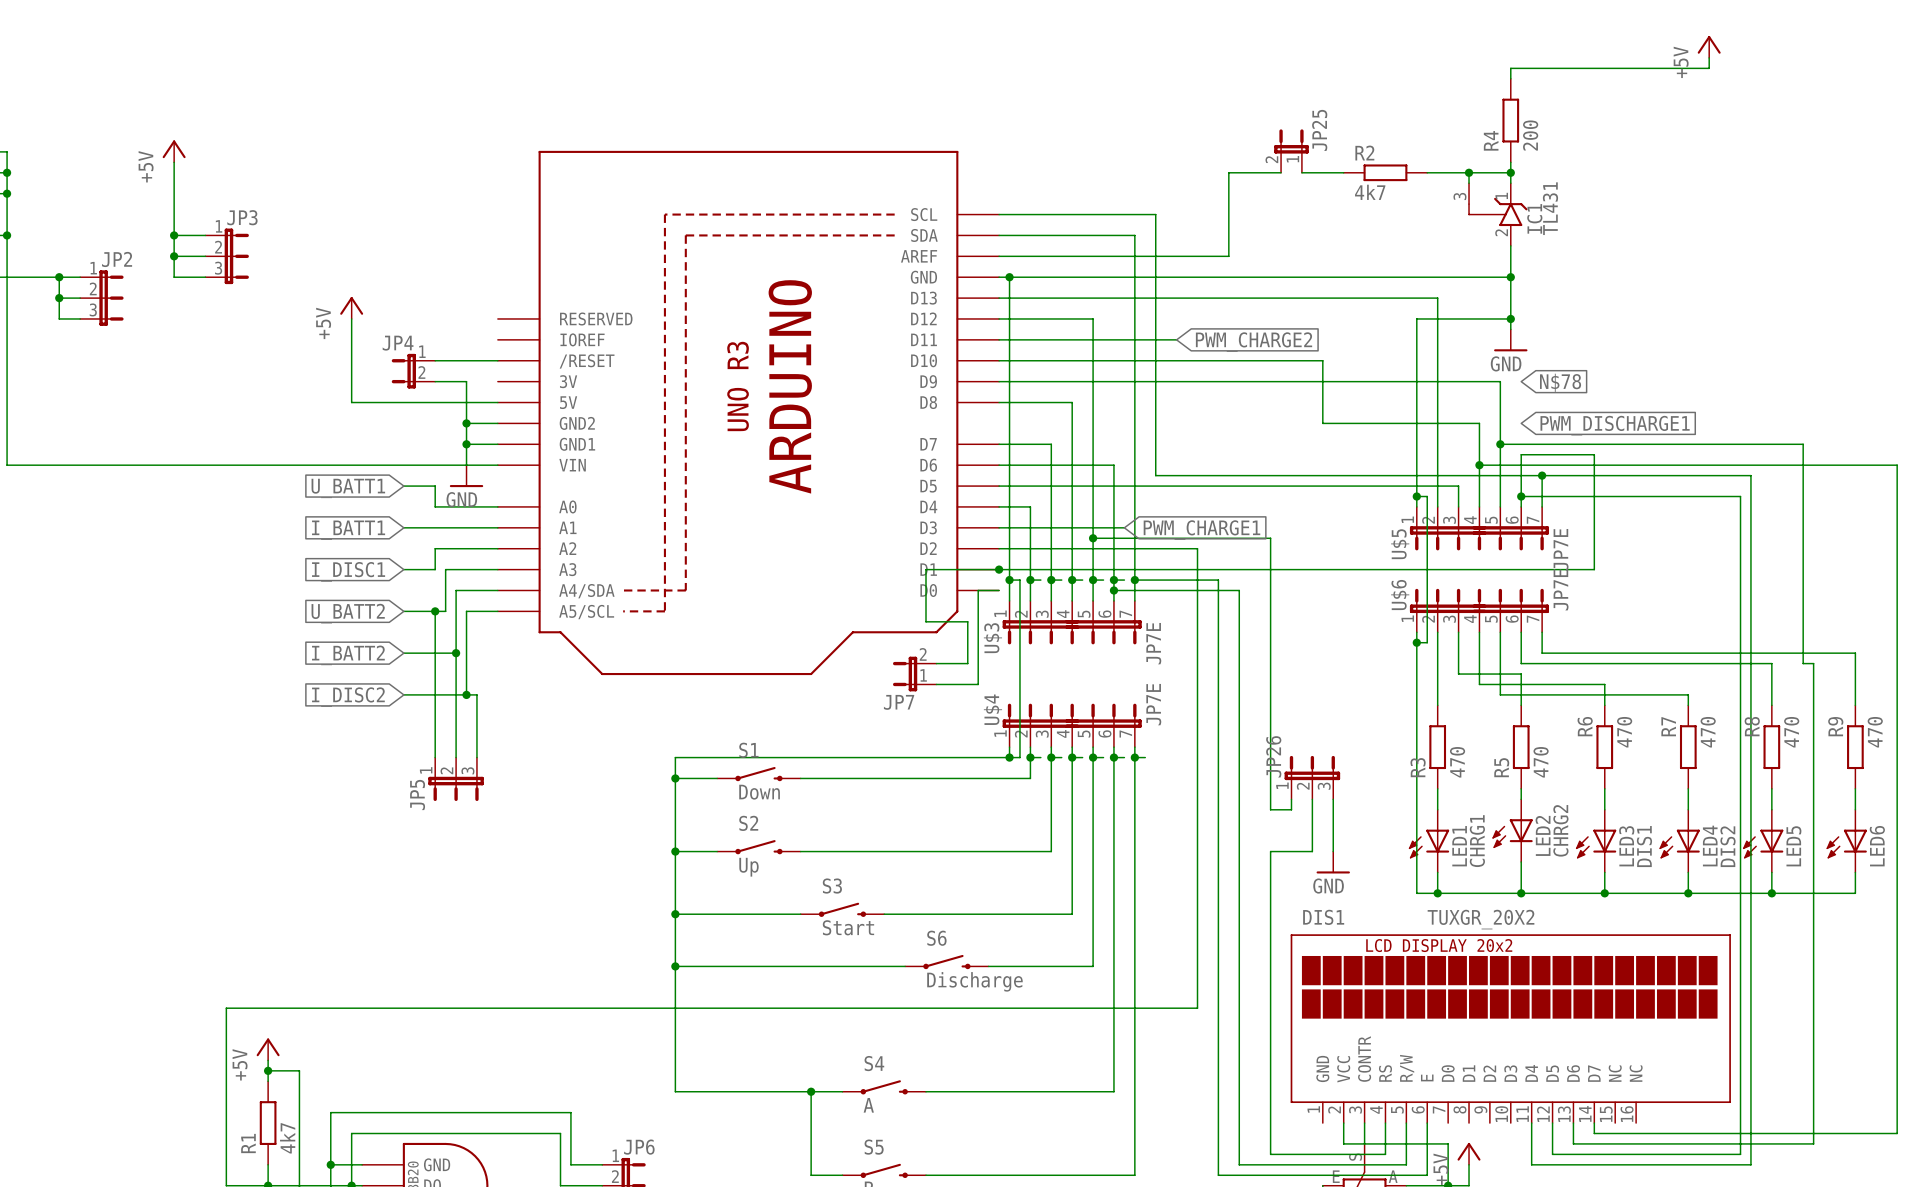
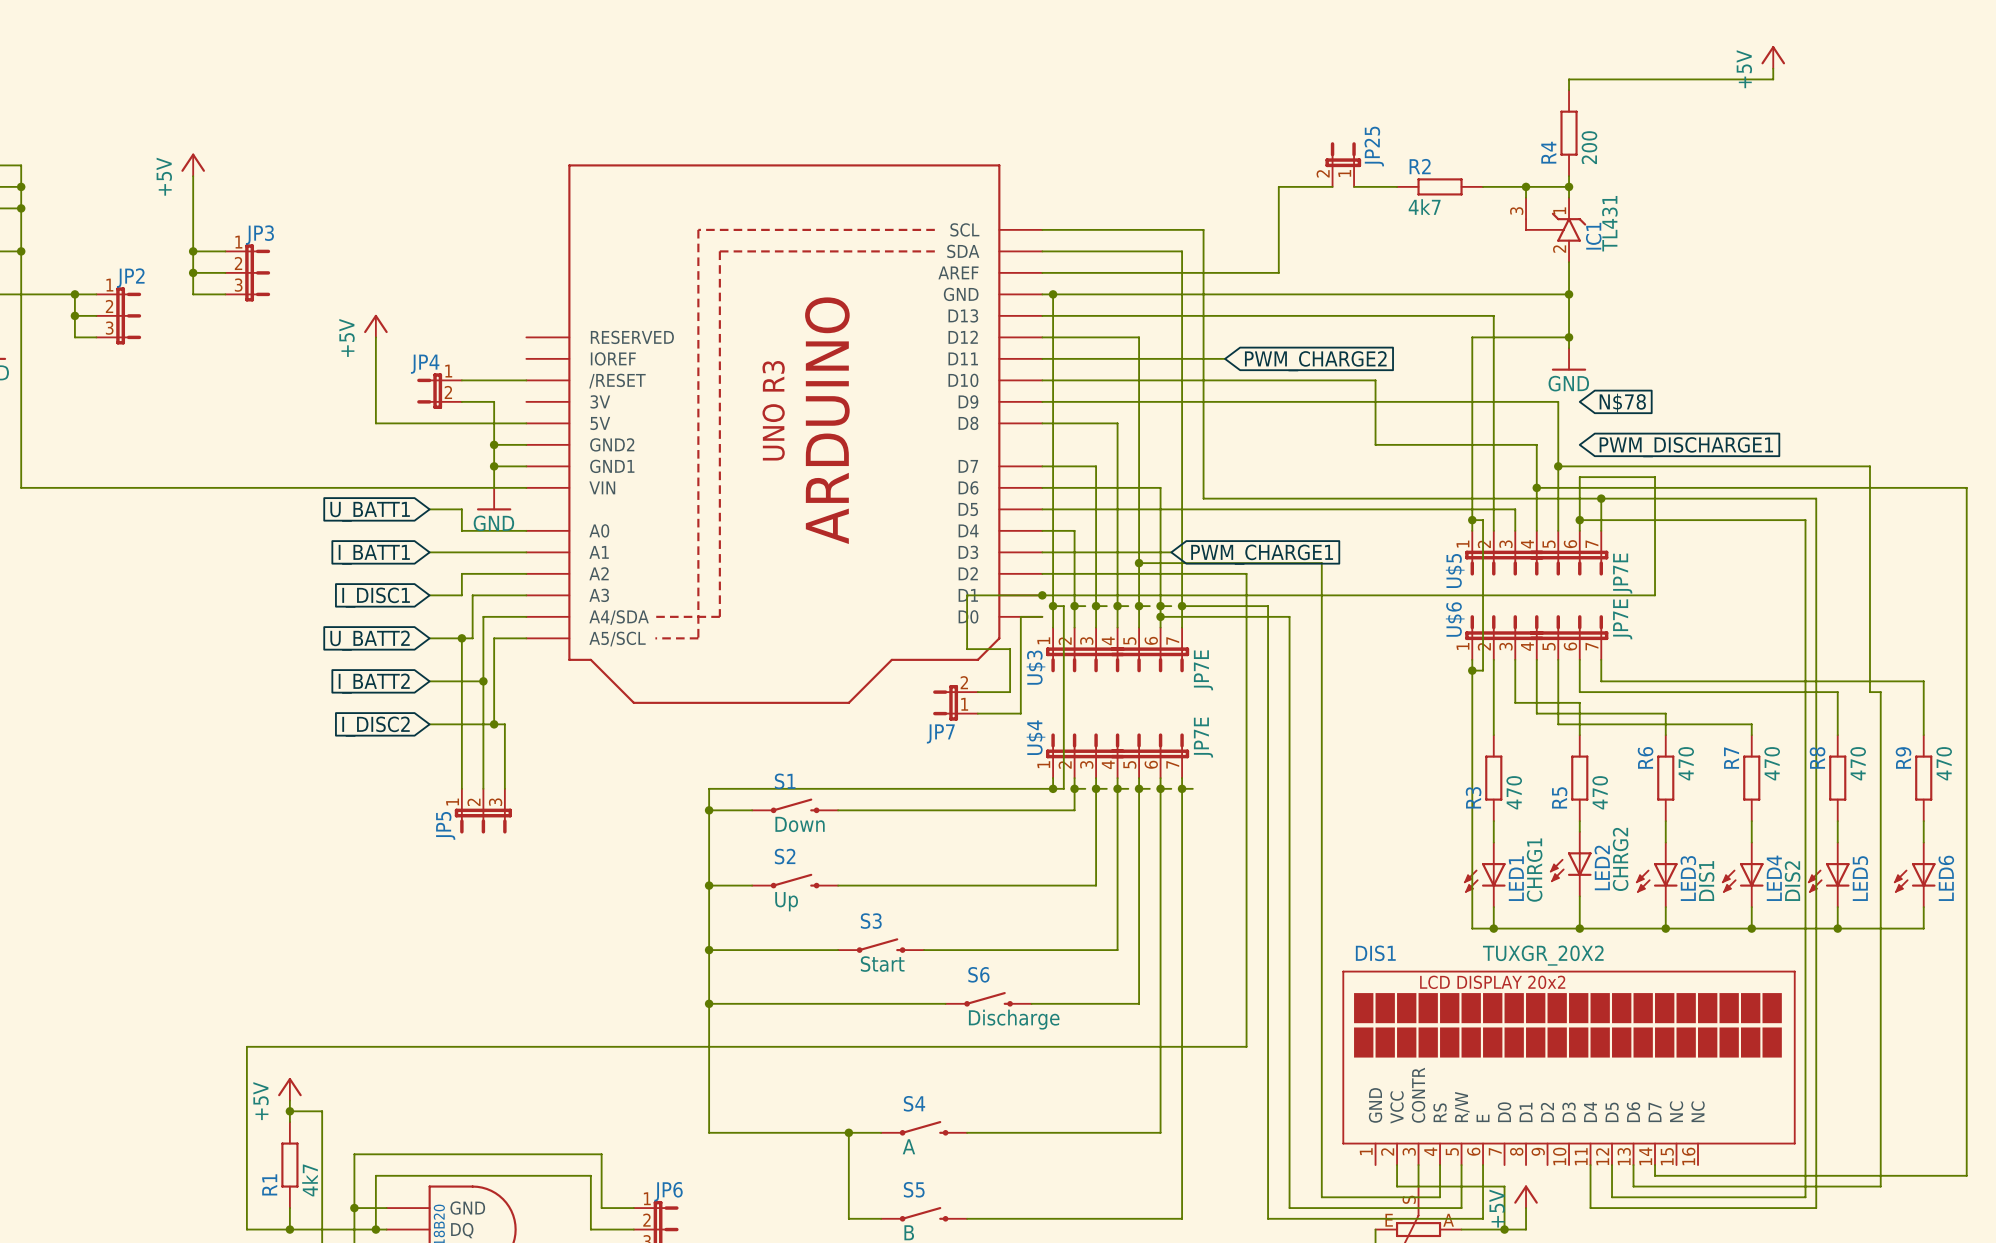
JP26: (1312, 777) -> none
wire: (1291, 799) (1291, 809) (1270, 809) -> none
wire: (1312, 799) (1312, 851) (1270, 851) -> (1321, 842) (1321, 885)
wire: (1333, 799) (1333, 851) -> none
power symbol: GND (1333, 862) -> none

